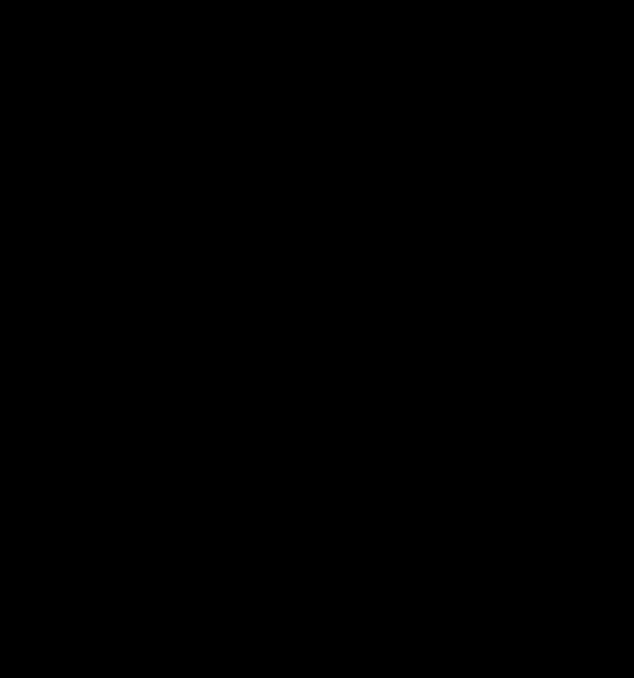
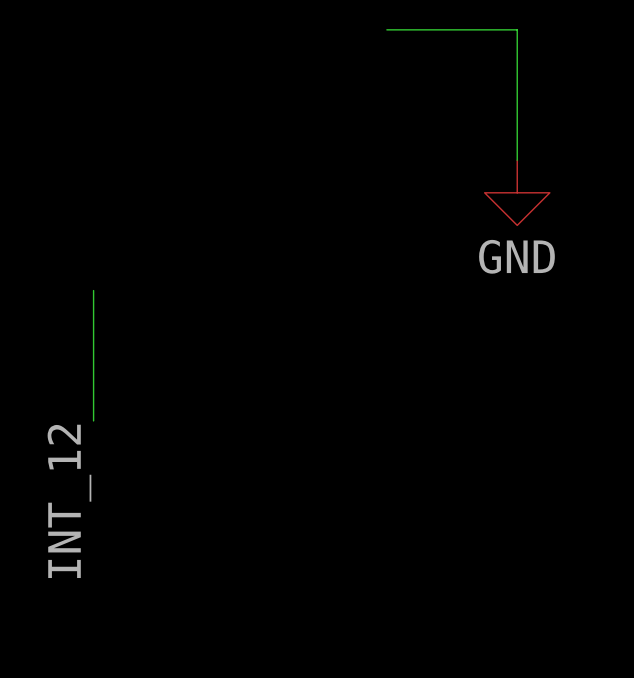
wire: none -> (386, 29) (517, 29) (517, 160)
power symbol: none -> GND (517, 192)
wire: none -> (93, 290) (93, 420)
label: none -> INT_12 (69, 501)

